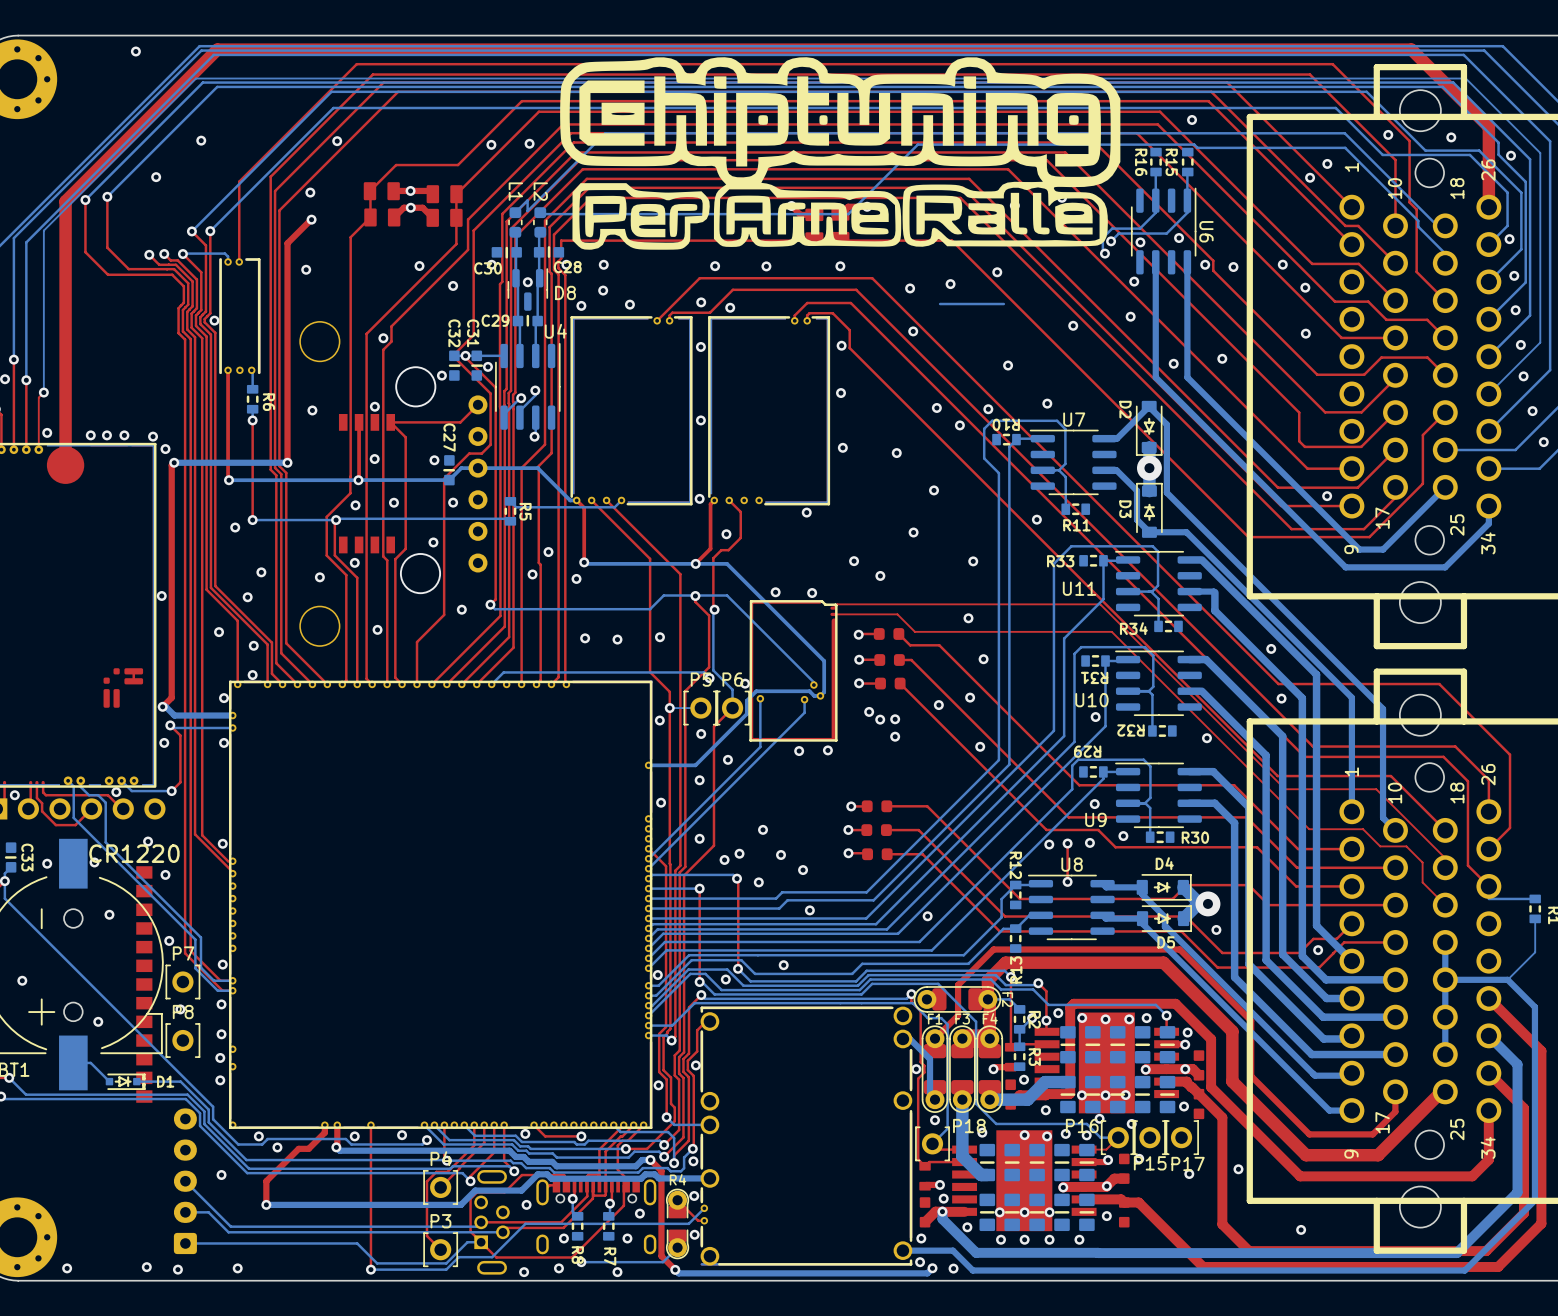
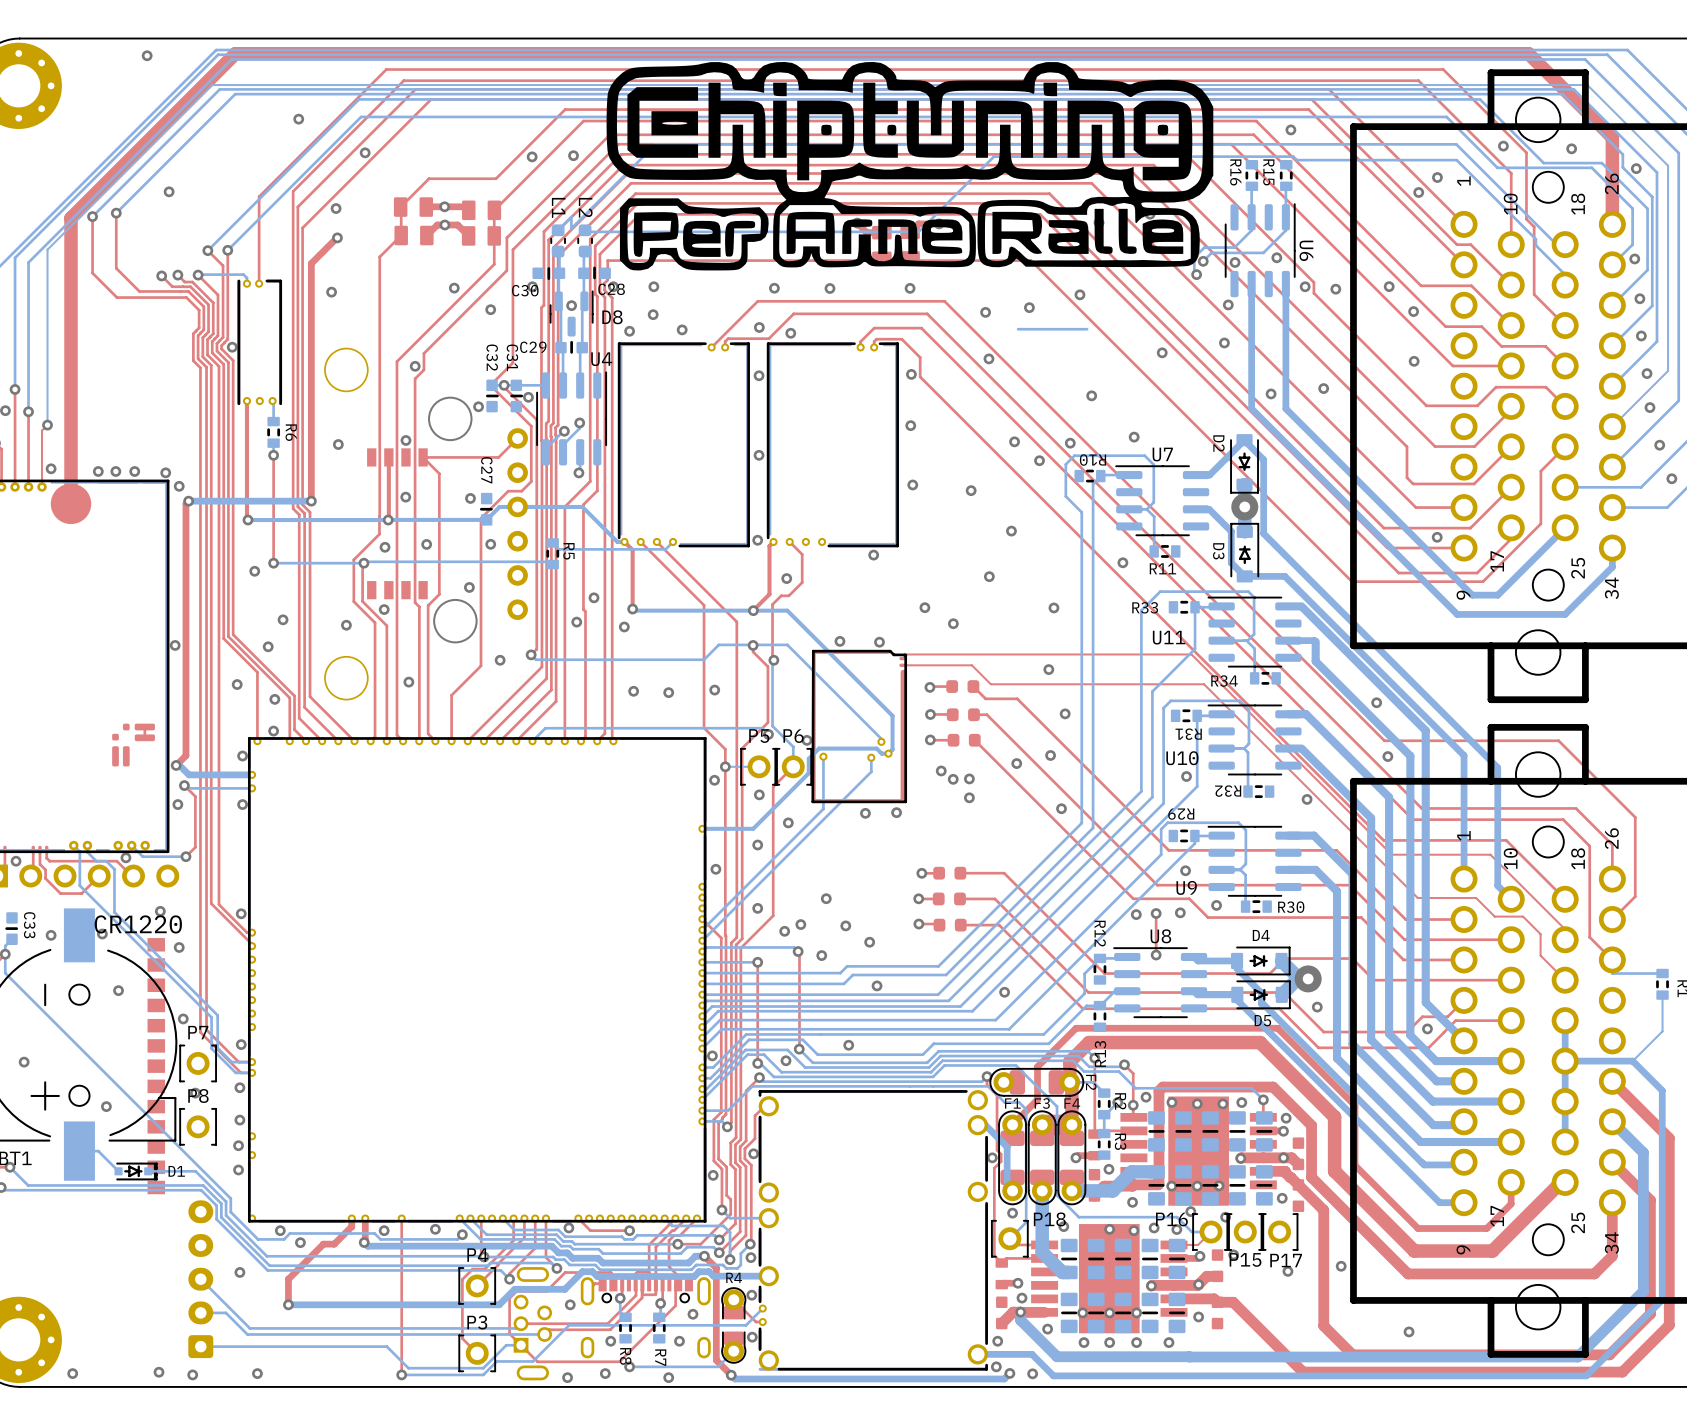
via: none -> (298, 119)
via: (201, 140) -> none

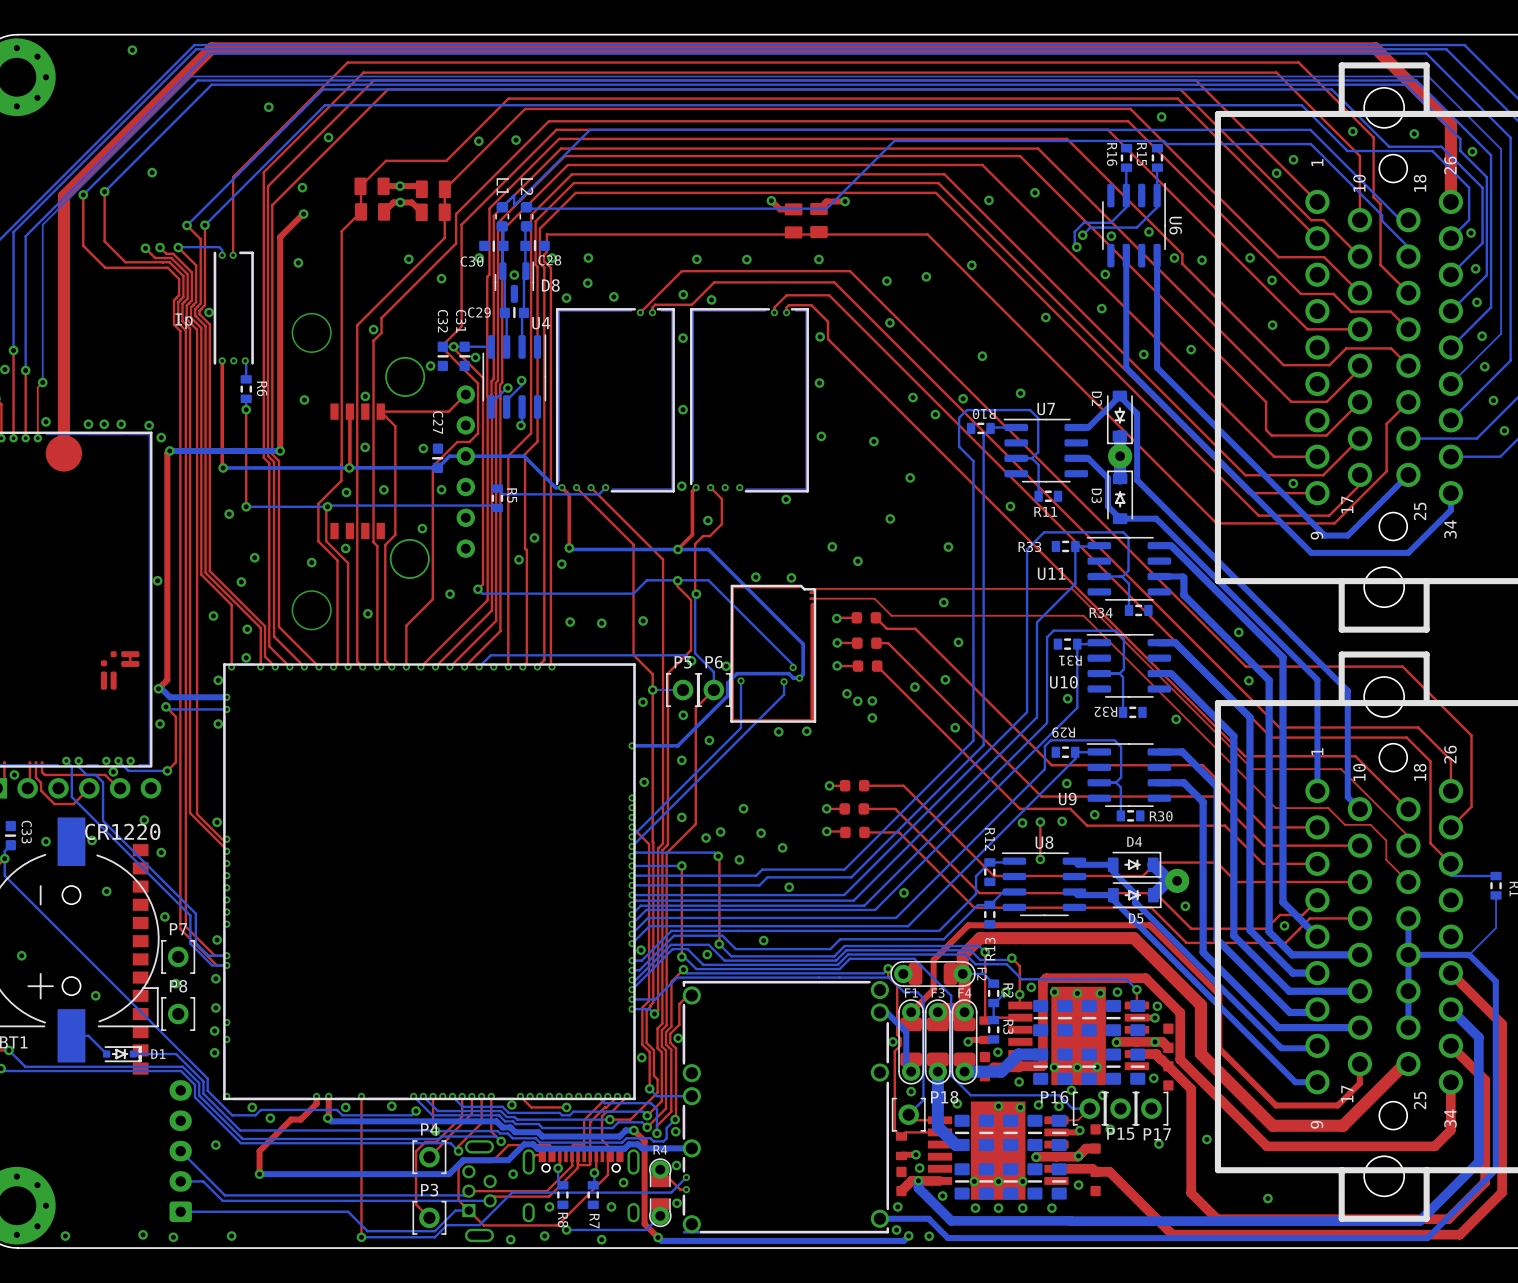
drawing: [606, 61, 1214, 271] -> none
bottom track: (1087, 329) (1018, 329) -> none
text: none -> Ip (184, 321)

